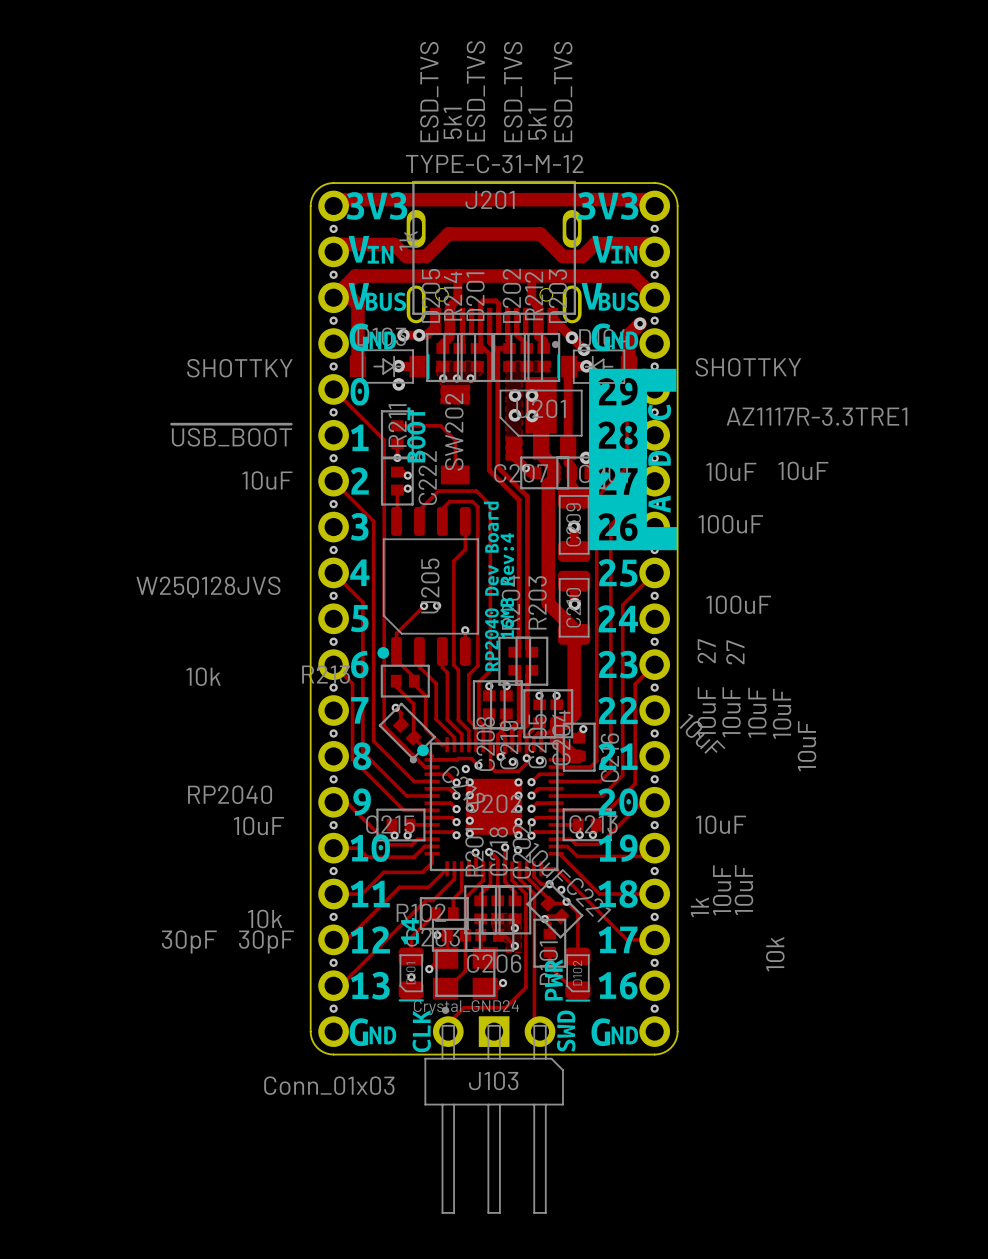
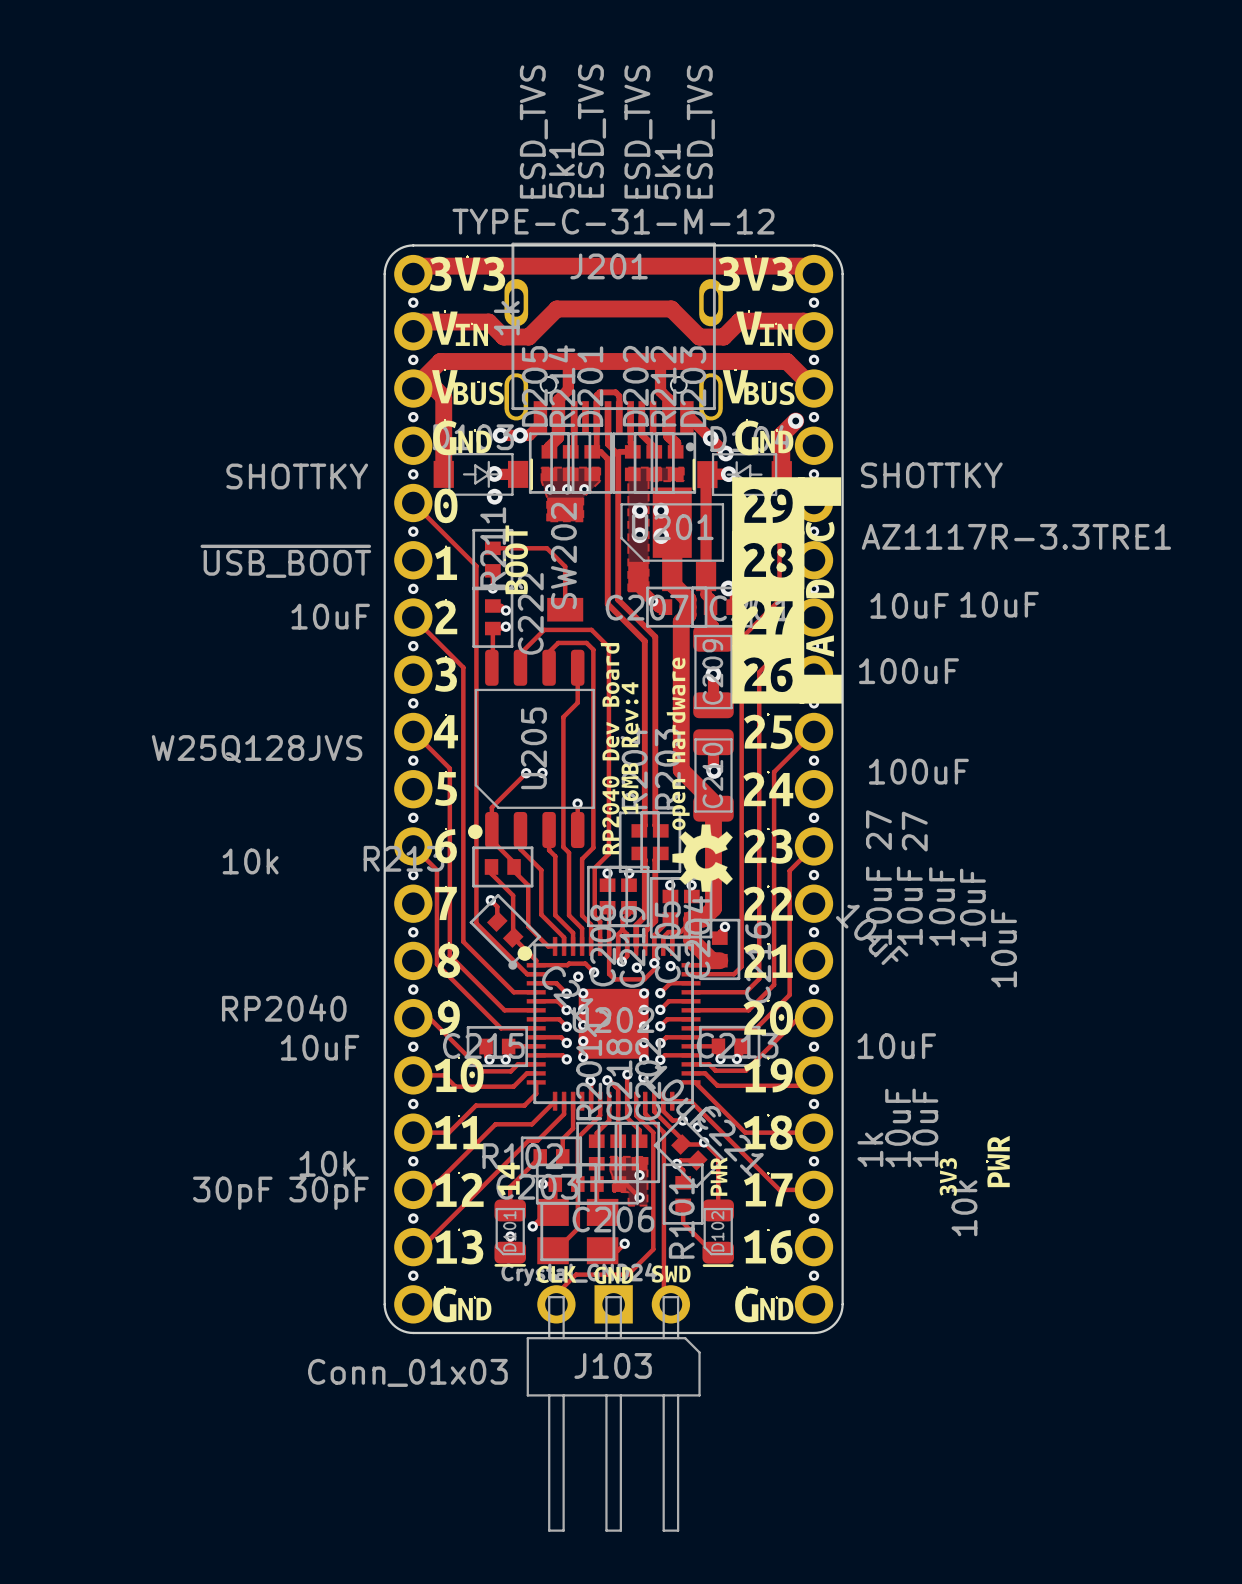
drawing: none -> [666, 657, 733, 892]
drawing: none -> [710, 1157, 728, 1196]
drawing: none -> [939, 1158, 957, 1196]
part position: (553, 979) -> (998, 1161)
drawing: none -> [537, 1265, 691, 1284]
part: (421, 1031) -> none
part: (566, 1031) -> none

